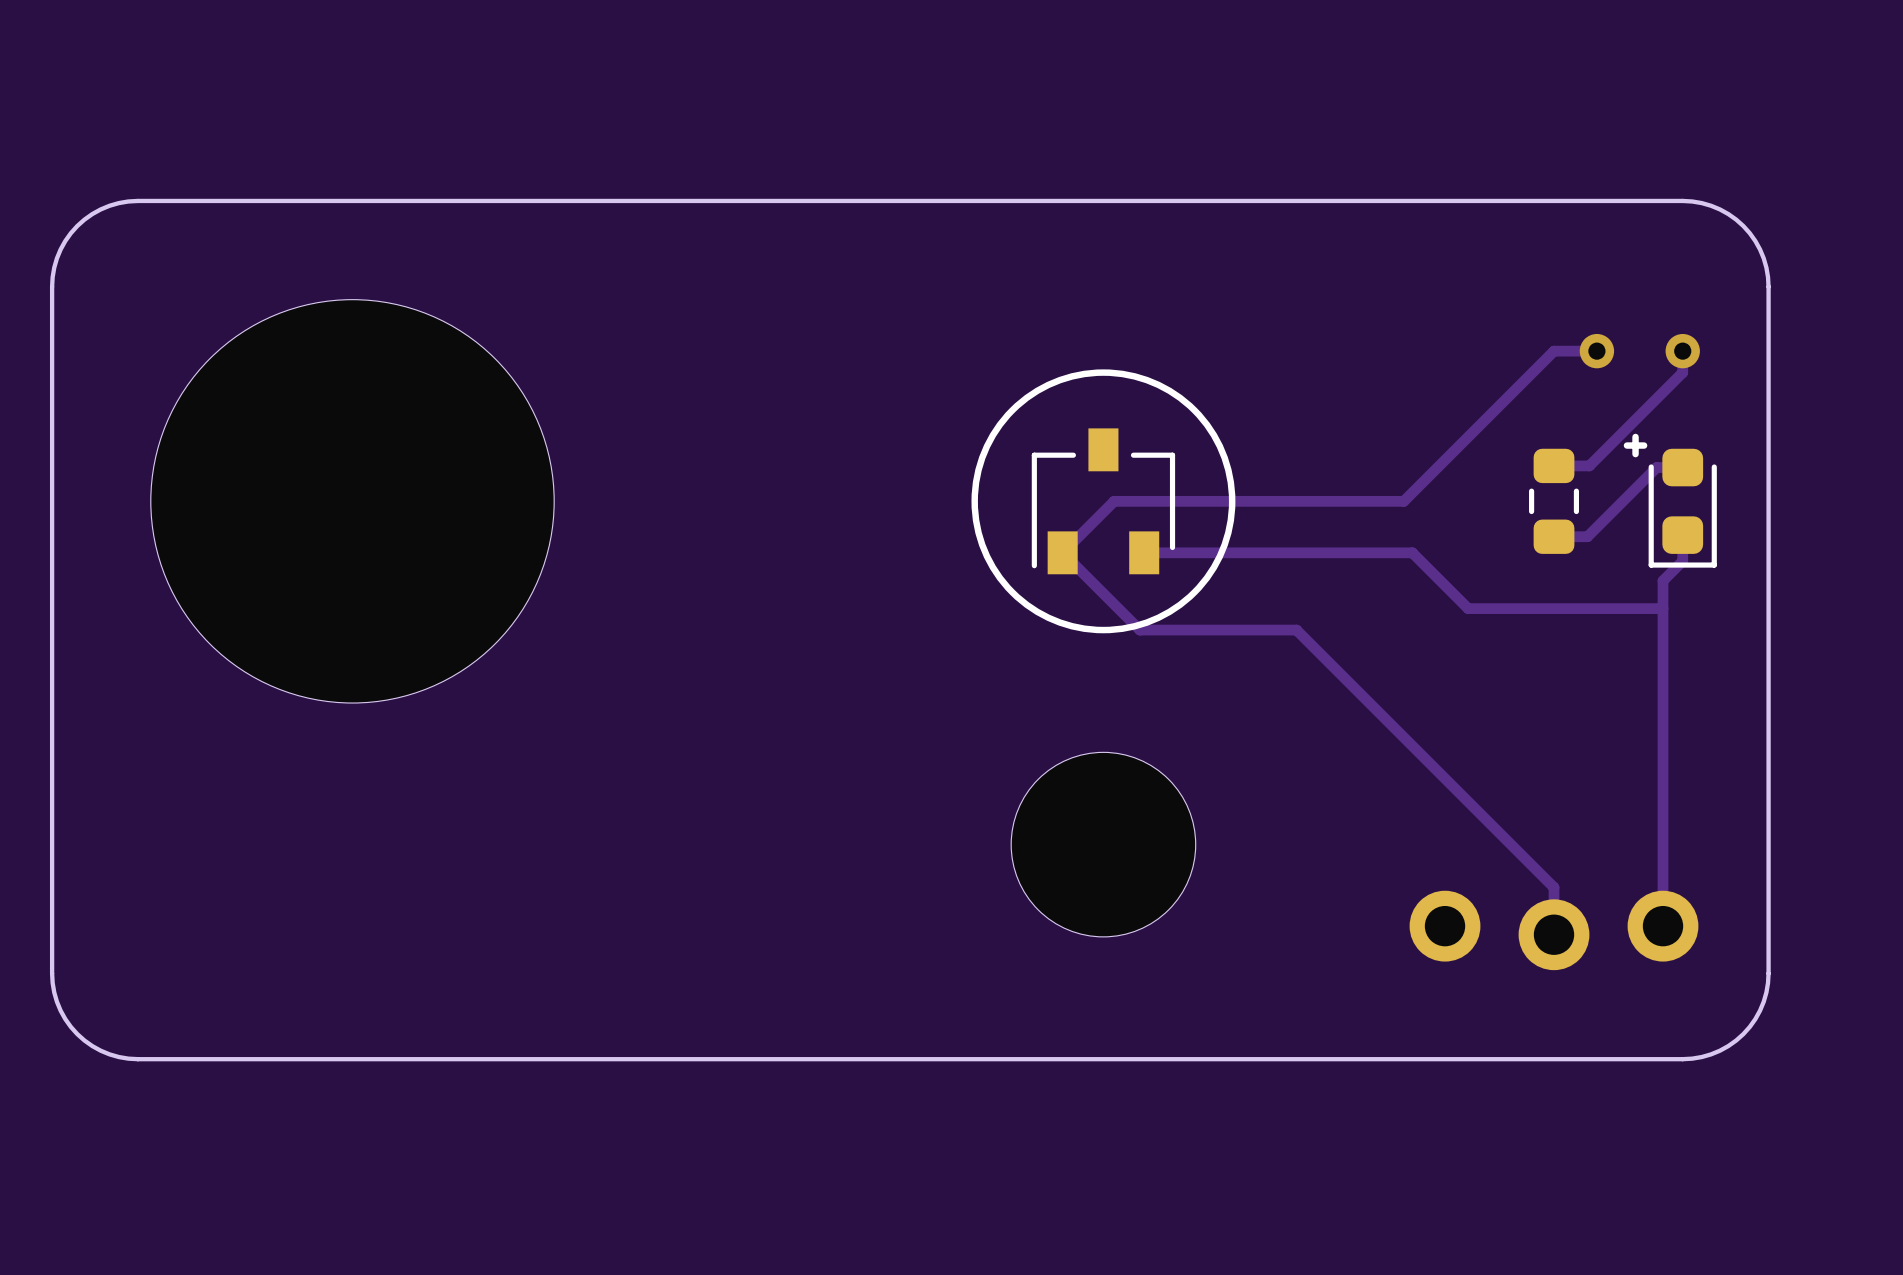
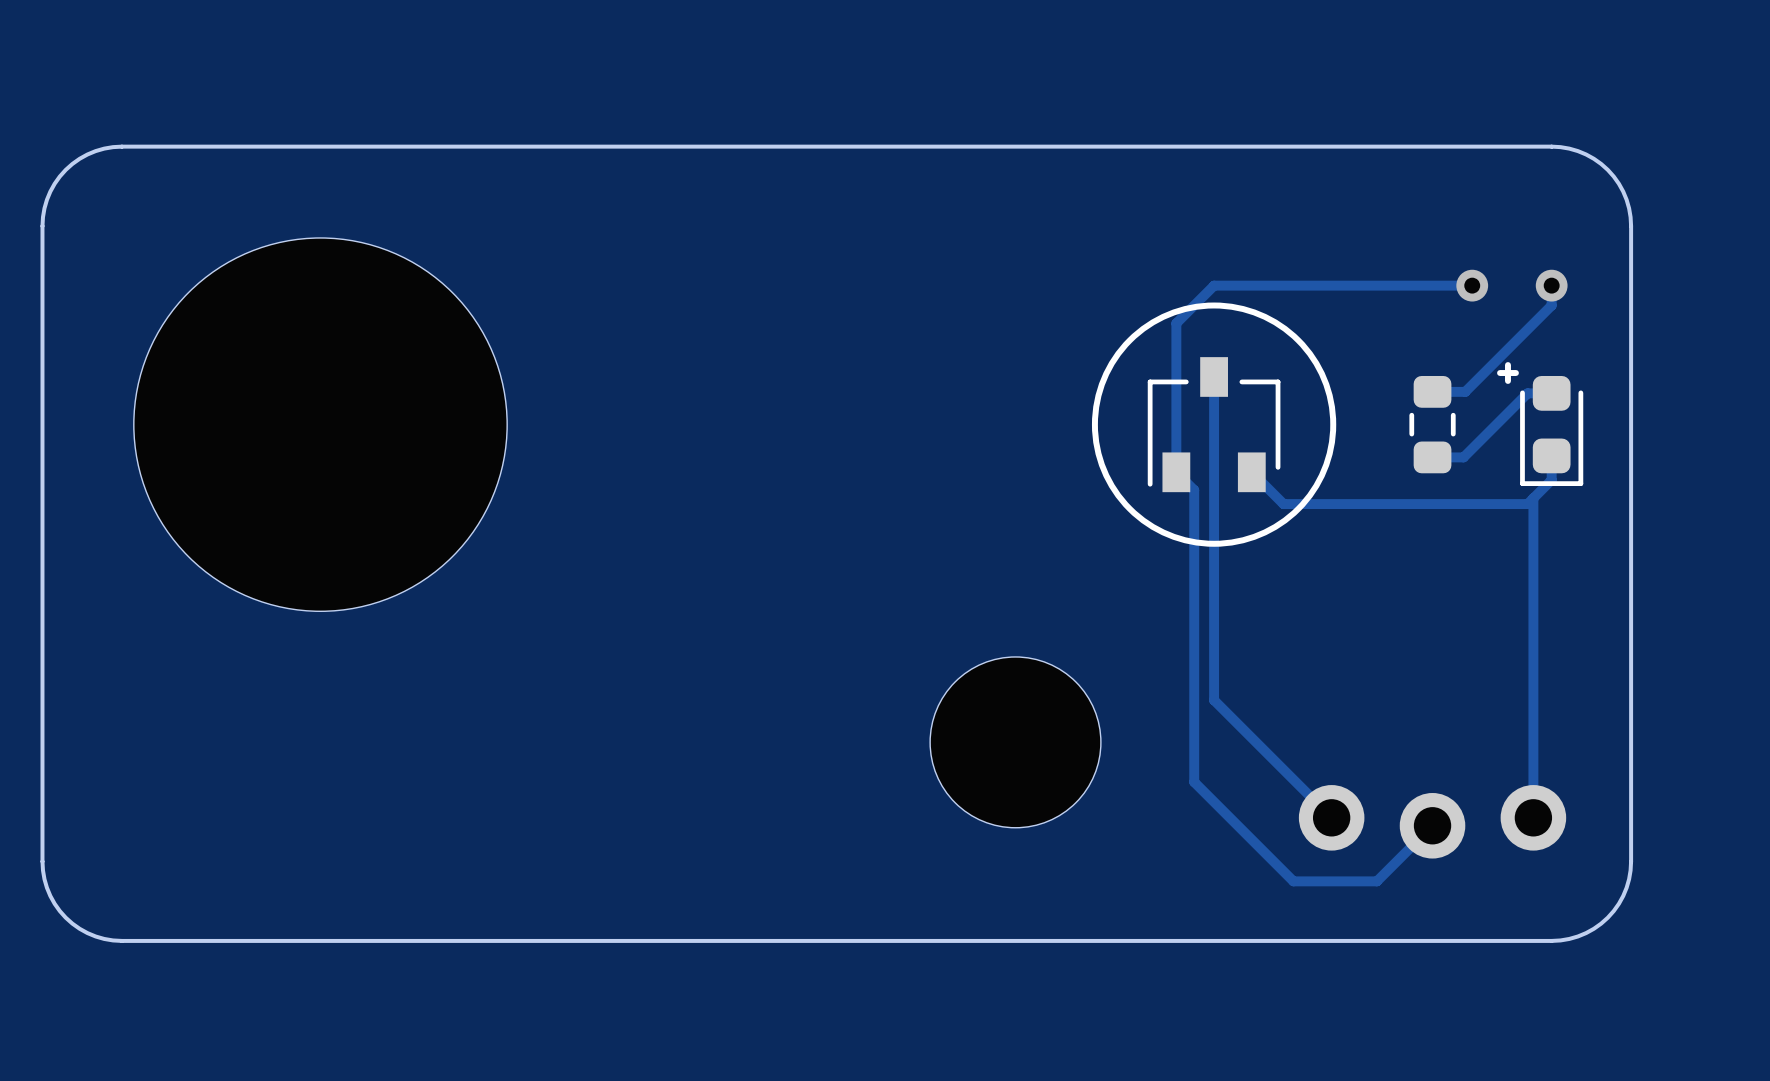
track: (1554, 351) (1403, 501) (1114, 501) (1062, 552) (1139, 630) (1296, 630) (1554, 887) (1554, 934) -> (1432, 285) (1214, 285) (1176, 323) (1176, 472) (1194, 490) (1194, 782) (1293, 881) (1376, 881) (1432, 825)
track: none -> (1214, 376) (1214, 700) (1331, 817)
part position: (1103, 501) -> (1214, 424)
drawing position: (1103, 501) -> (1214, 424)
track: (1144, 552) (1412, 552) (1468, 608) (1663, 608) -> none
track: none -> (1251, 472) (1283, 504) (1527, 504) (1533, 498)

